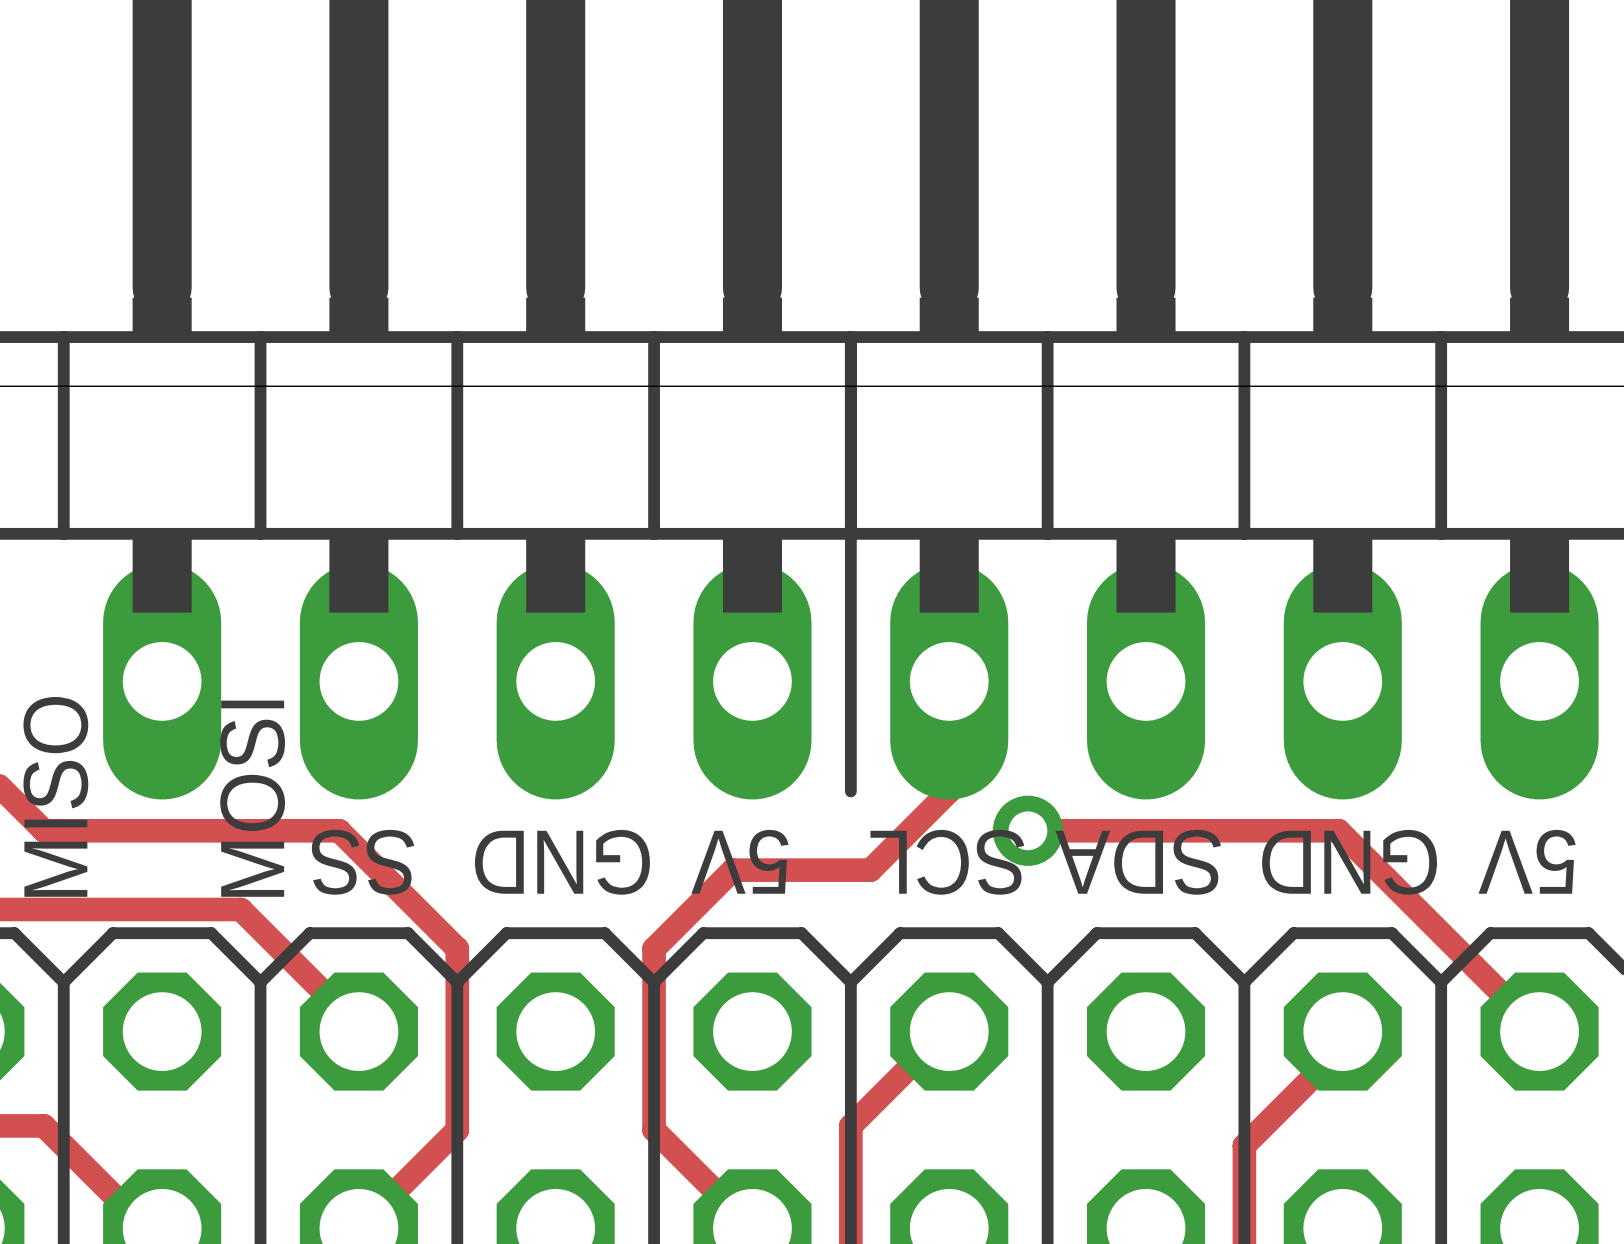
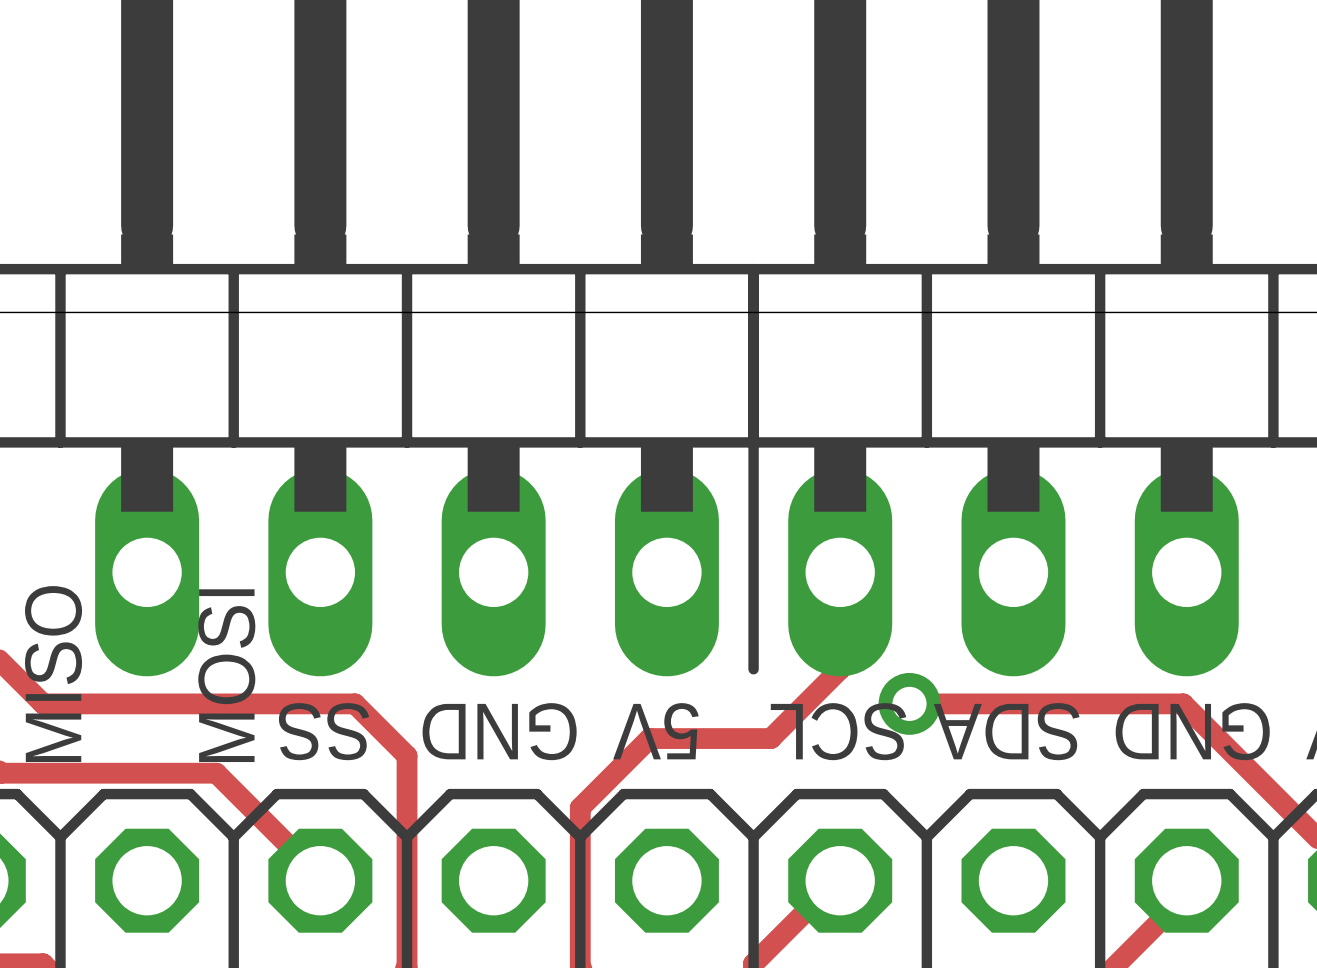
track: (339, 830) (457, 948) -> (303, 703) (355, 703) (407, 755) (407, 807)

